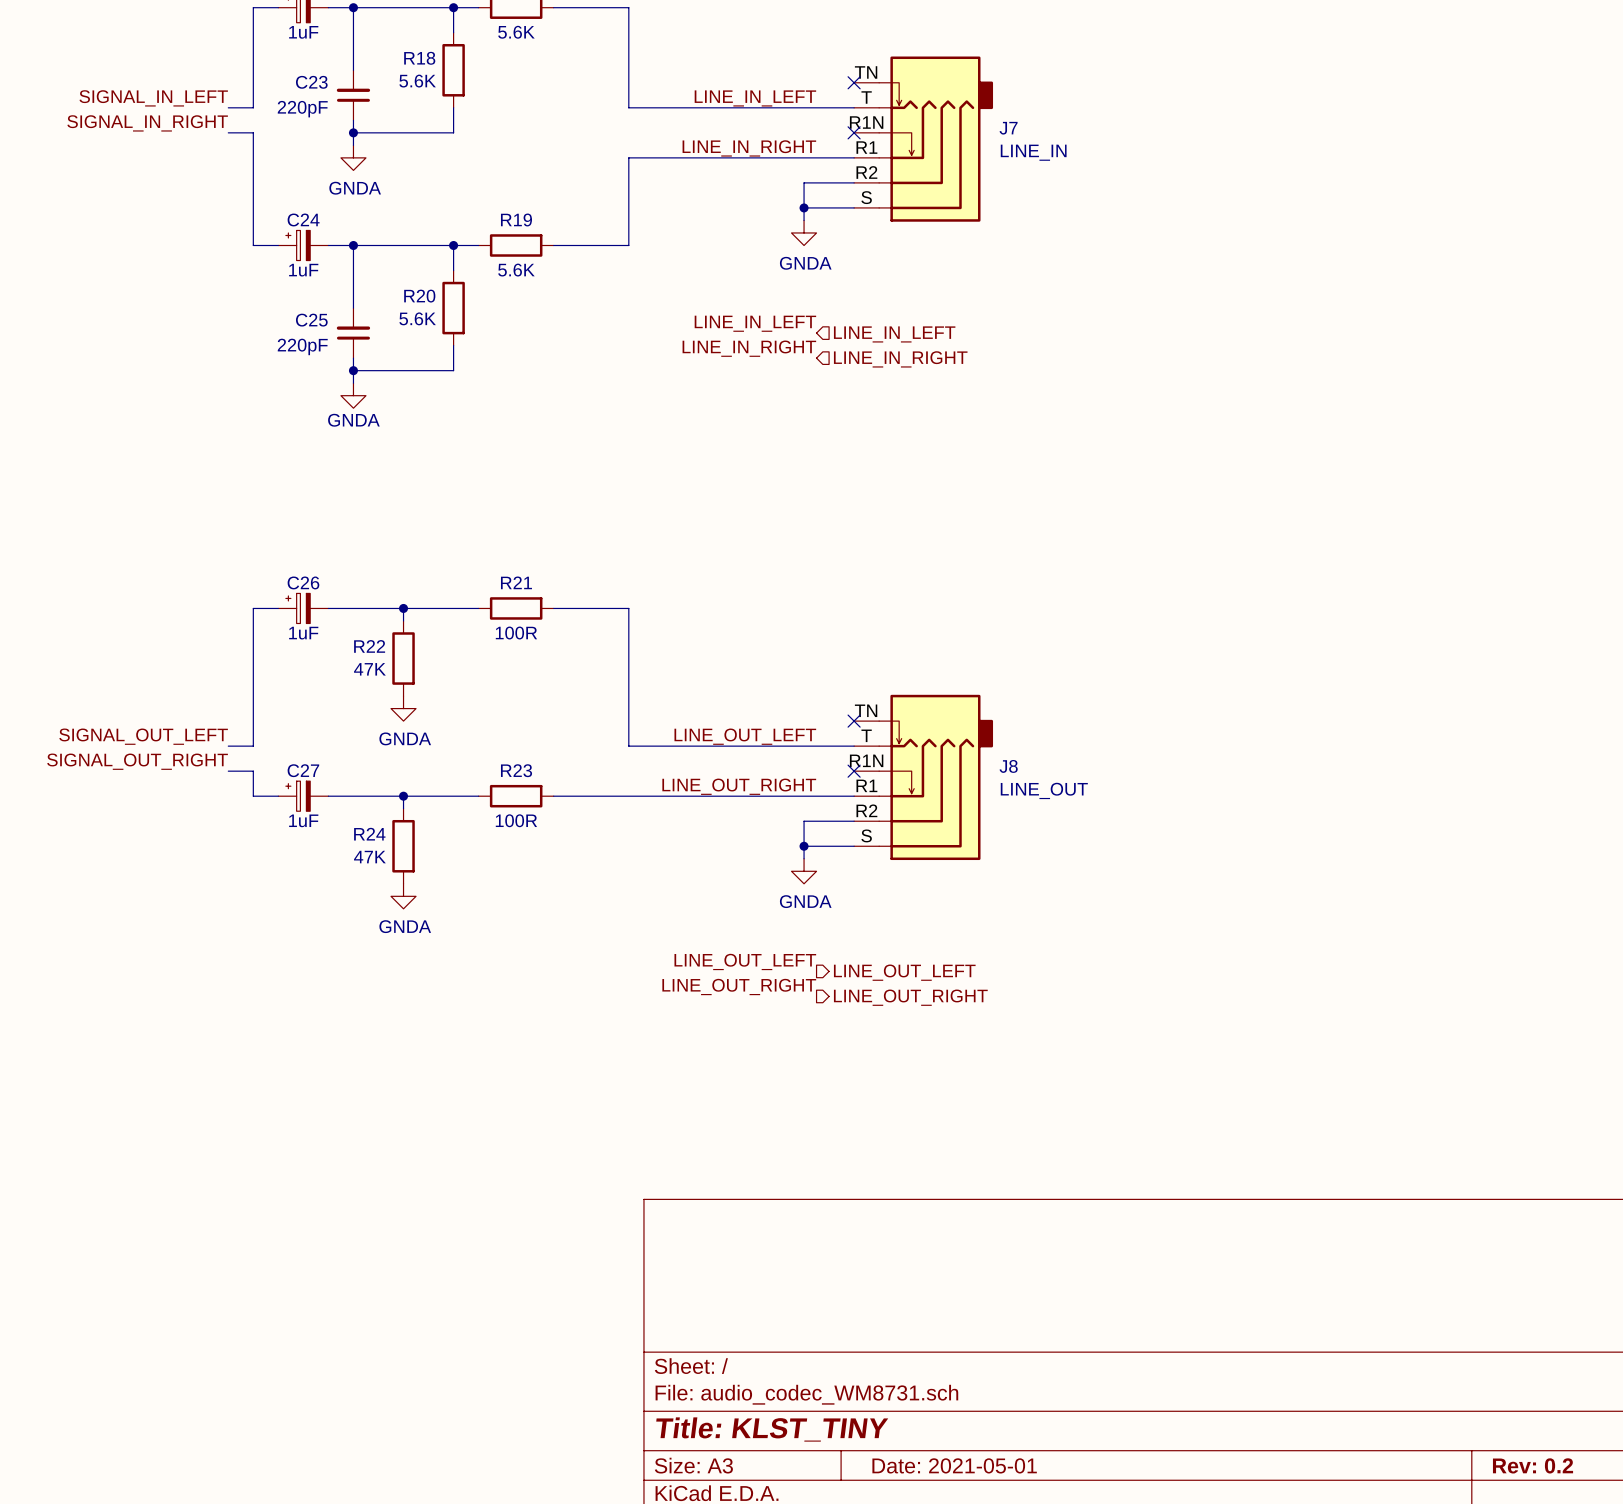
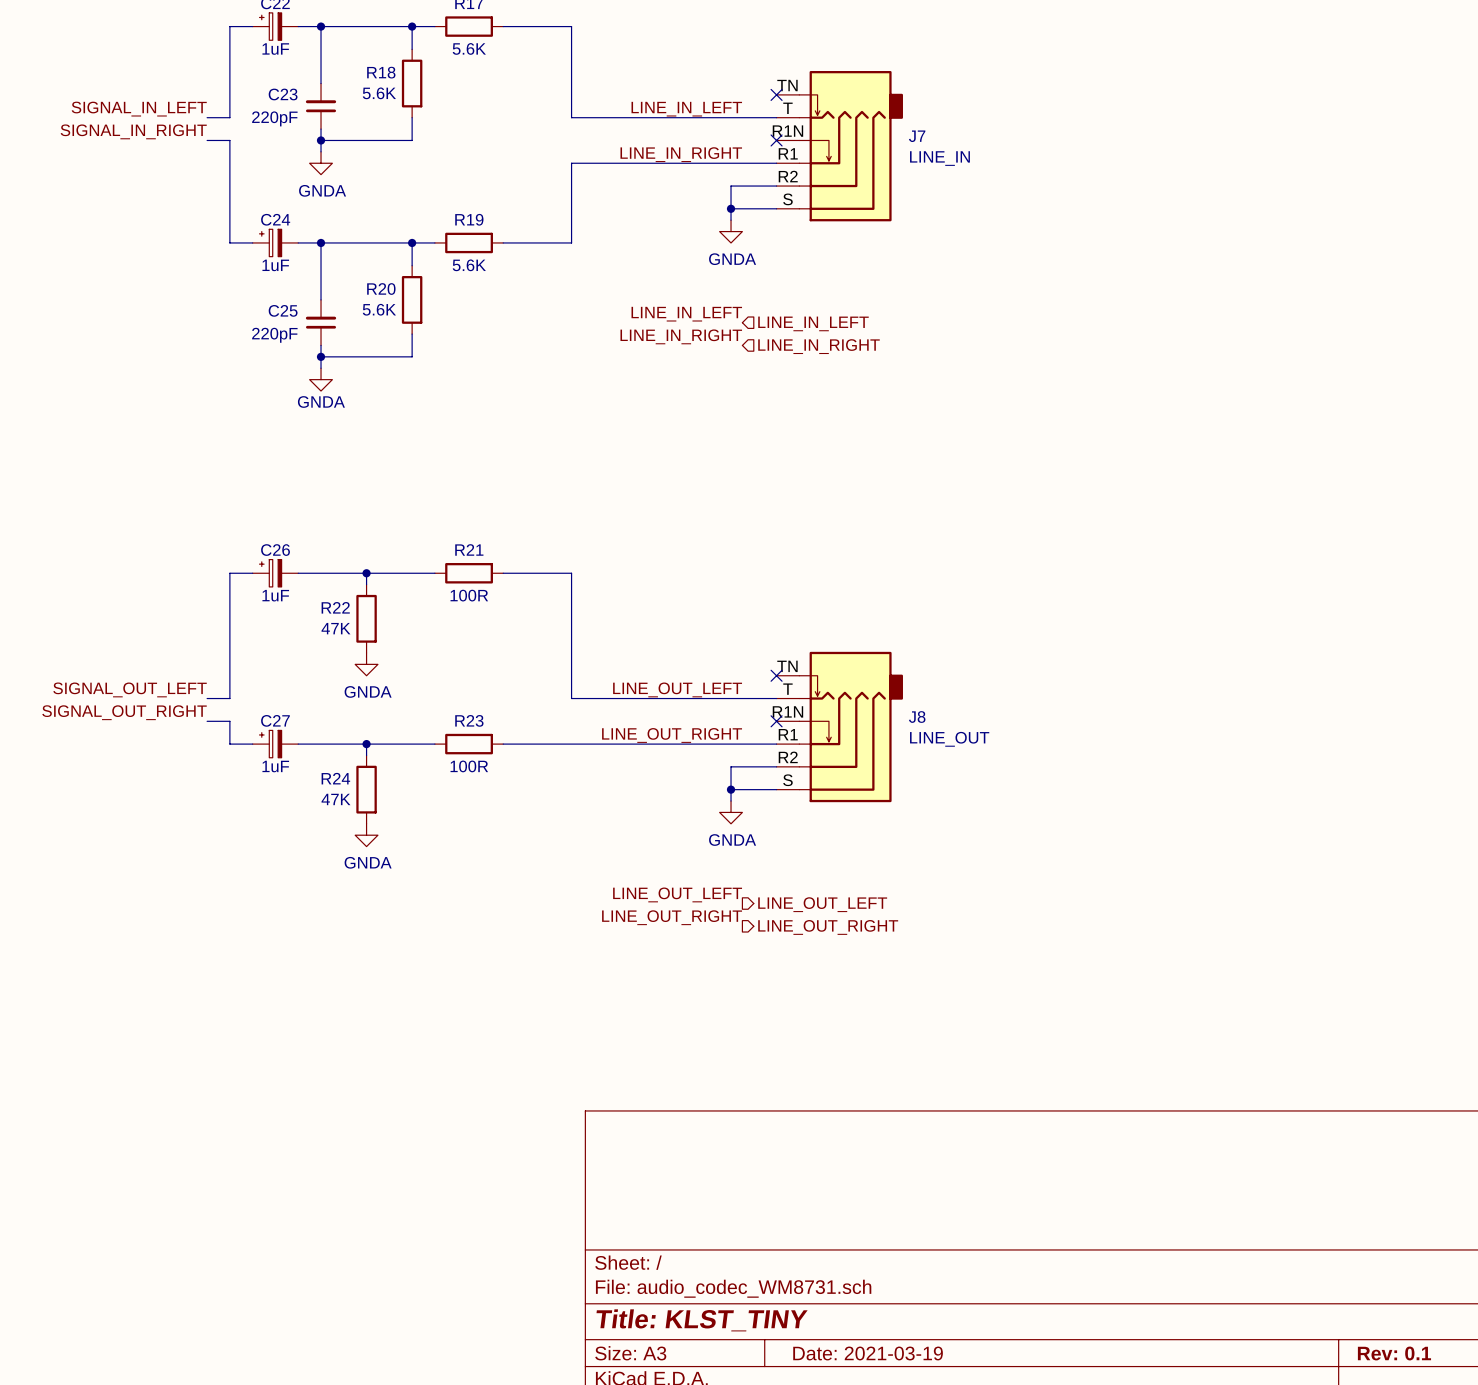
title block: Date: 2021-05-01 (954, 1465) -> Date: 2021-03-19 (868, 1353)
title block: Rev: 0.2 (1533, 1465) -> Rev: 0.1 (1394, 1353)

